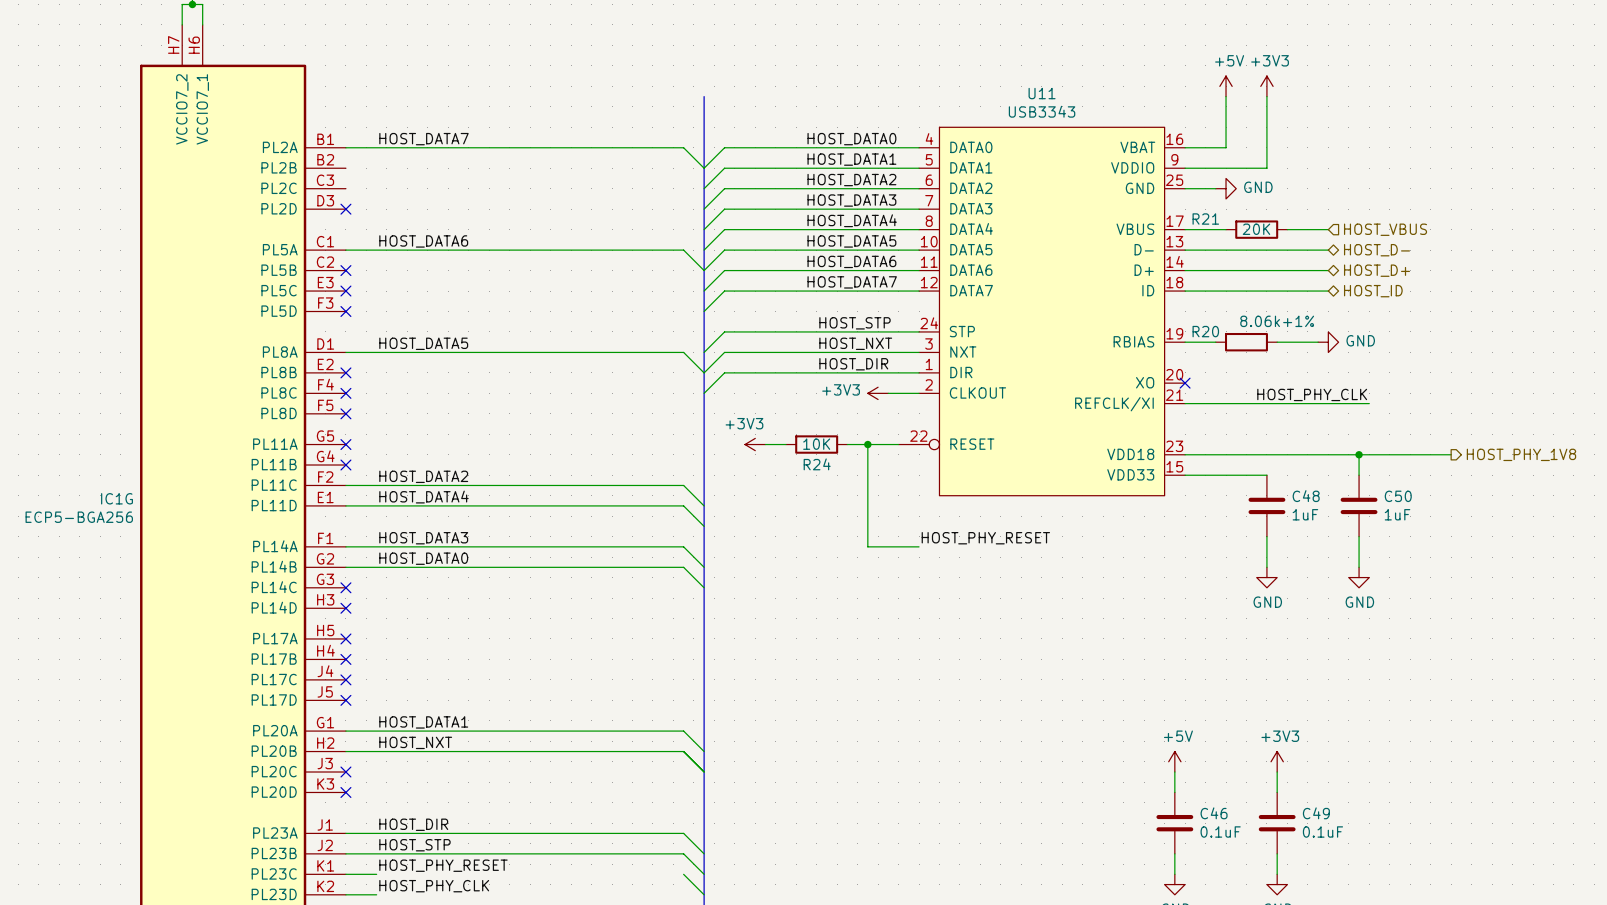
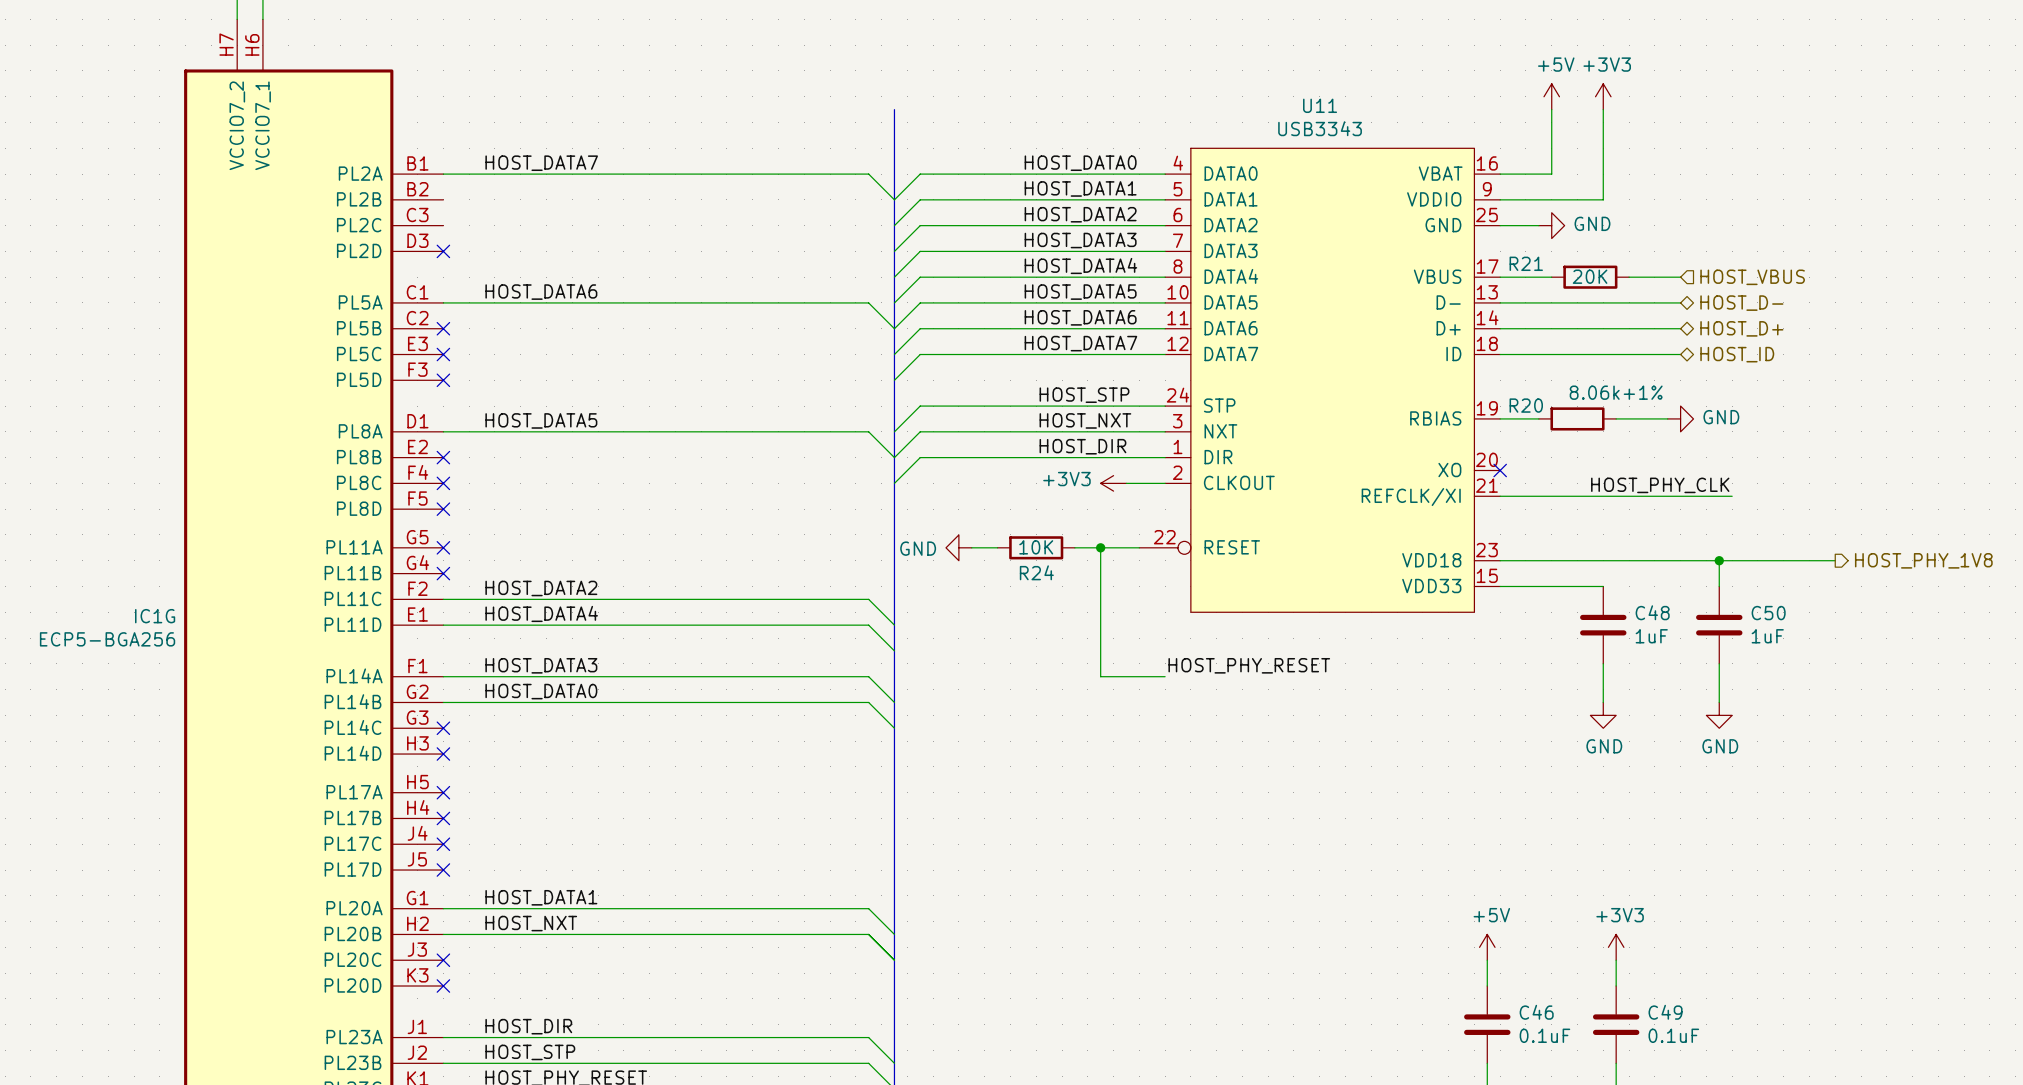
power symbol: +3V3 (755, 444) -> GND (958, 547)

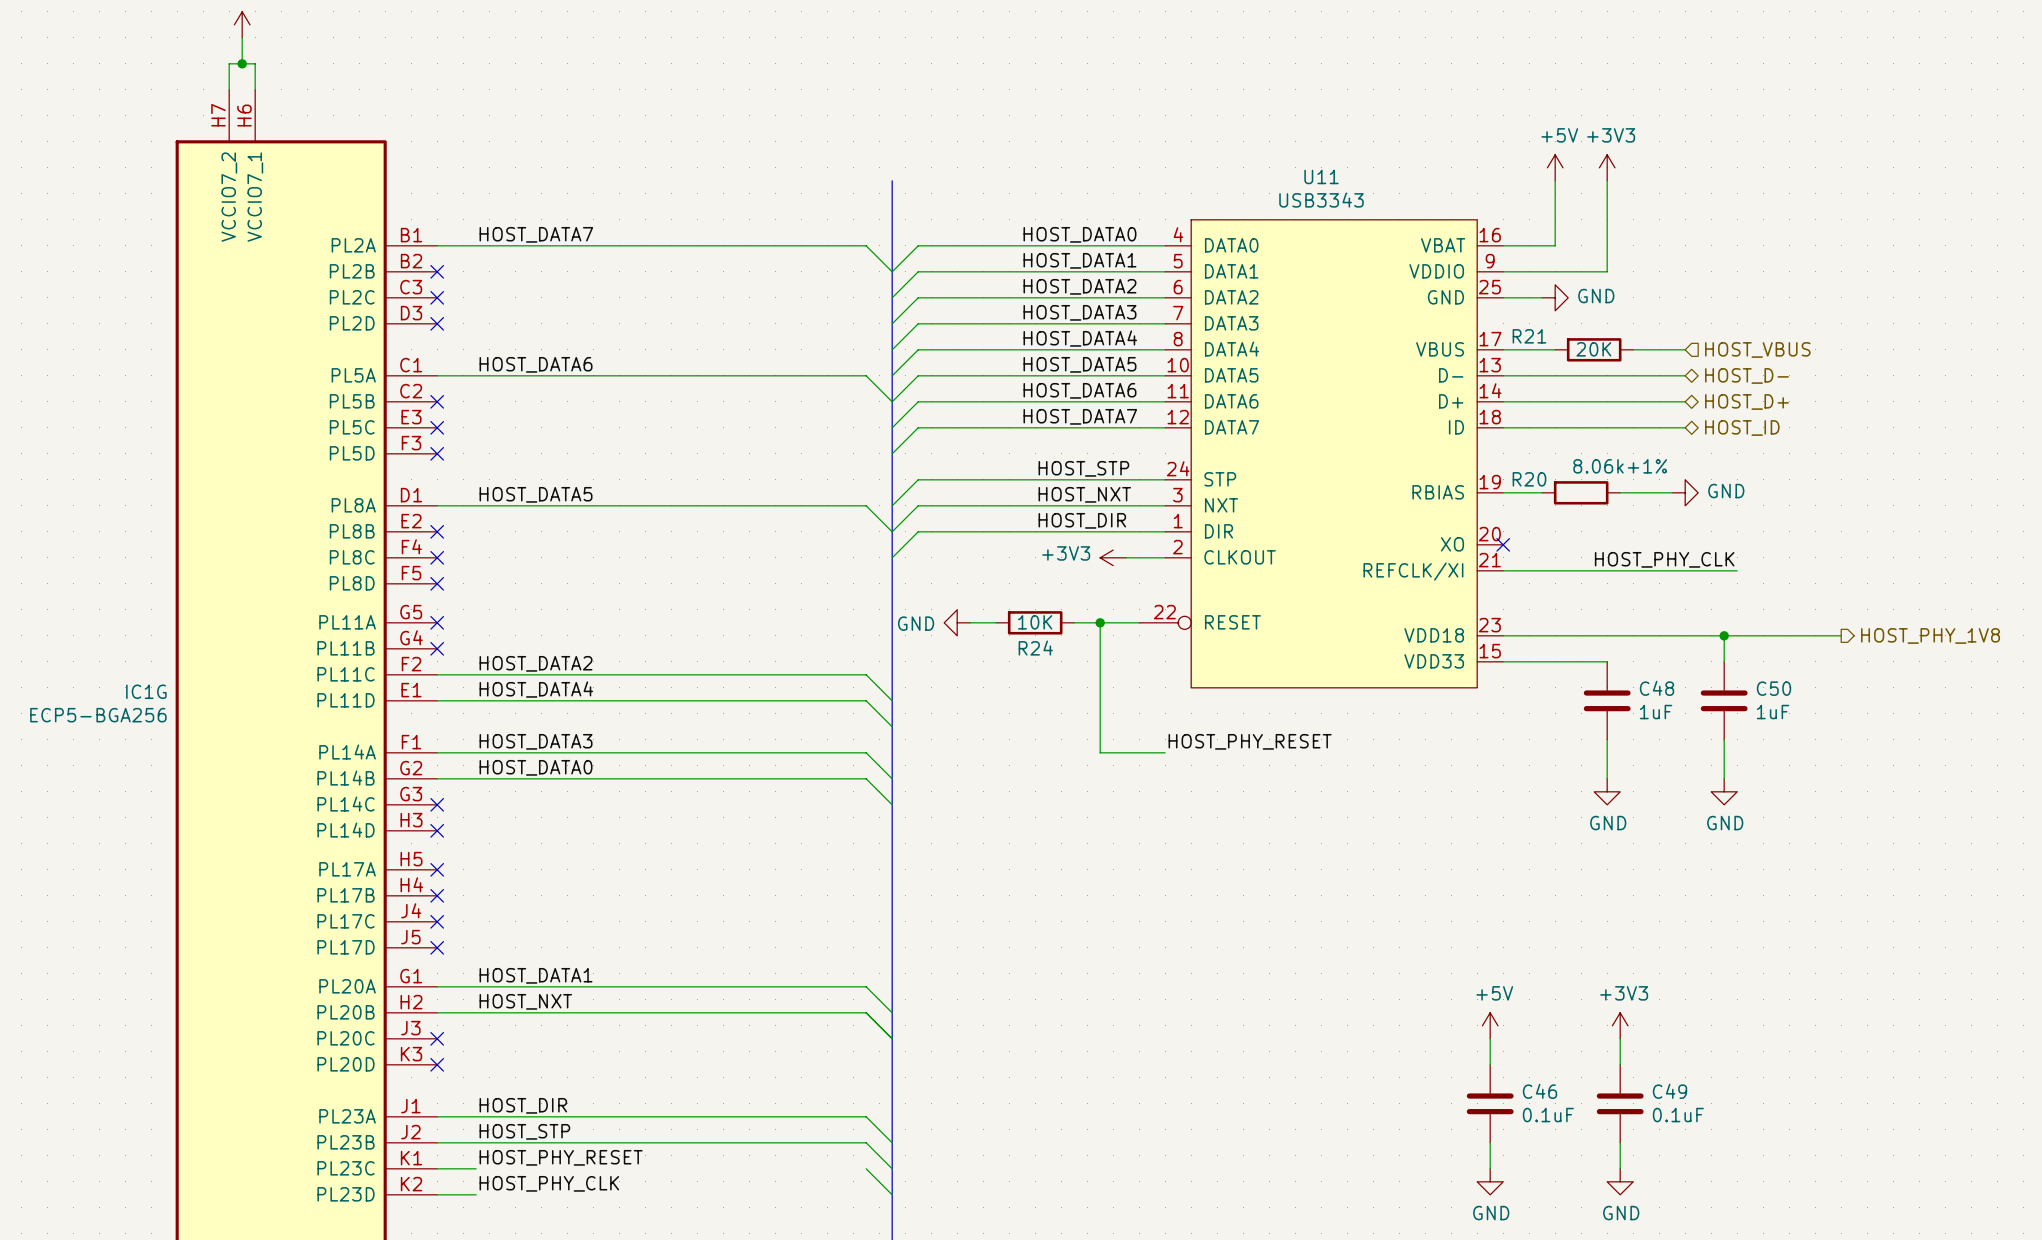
no-connect mark: none -> (437, 271)
no-connect mark: none -> (437, 297)

